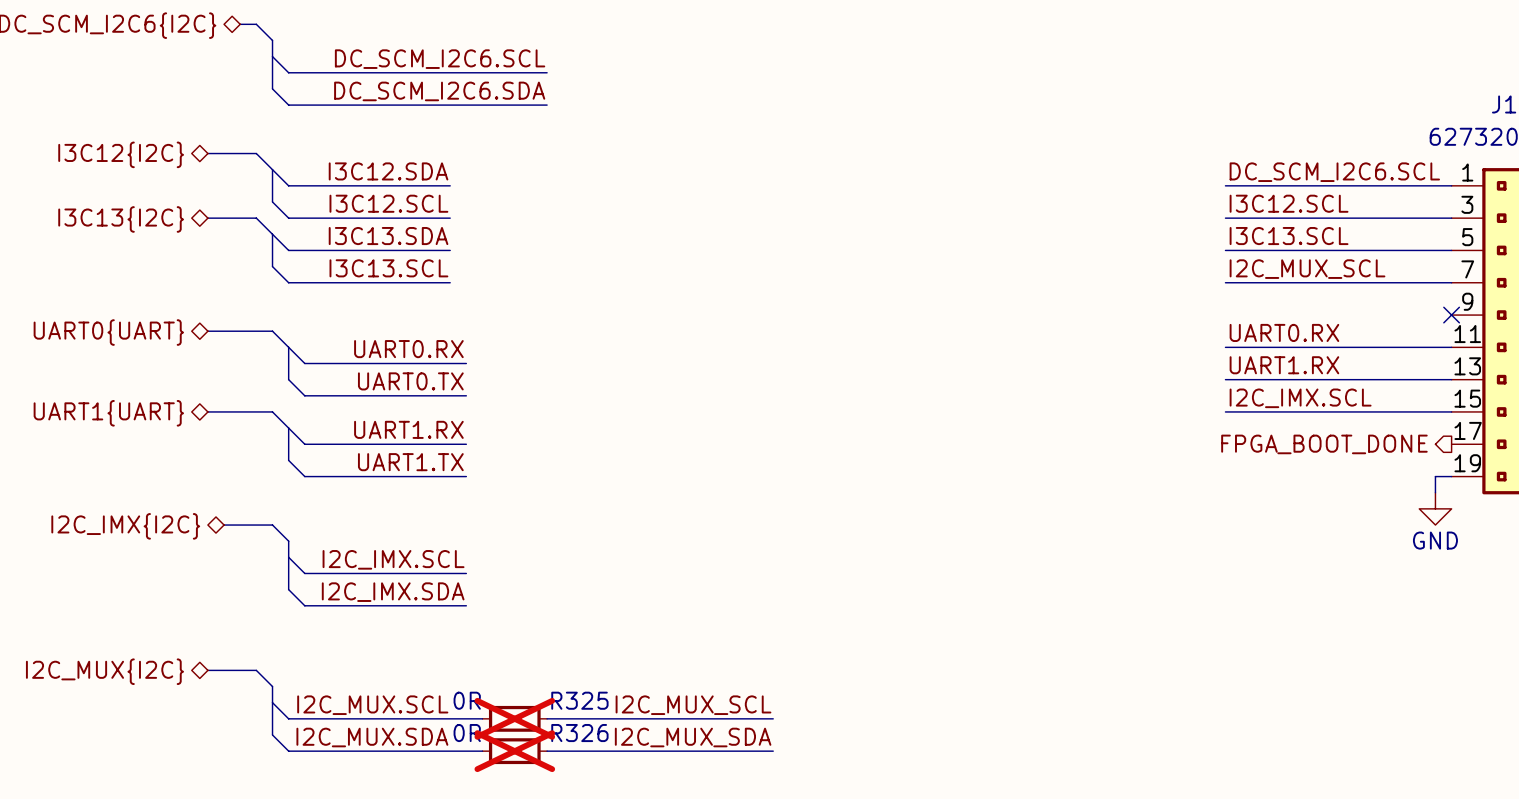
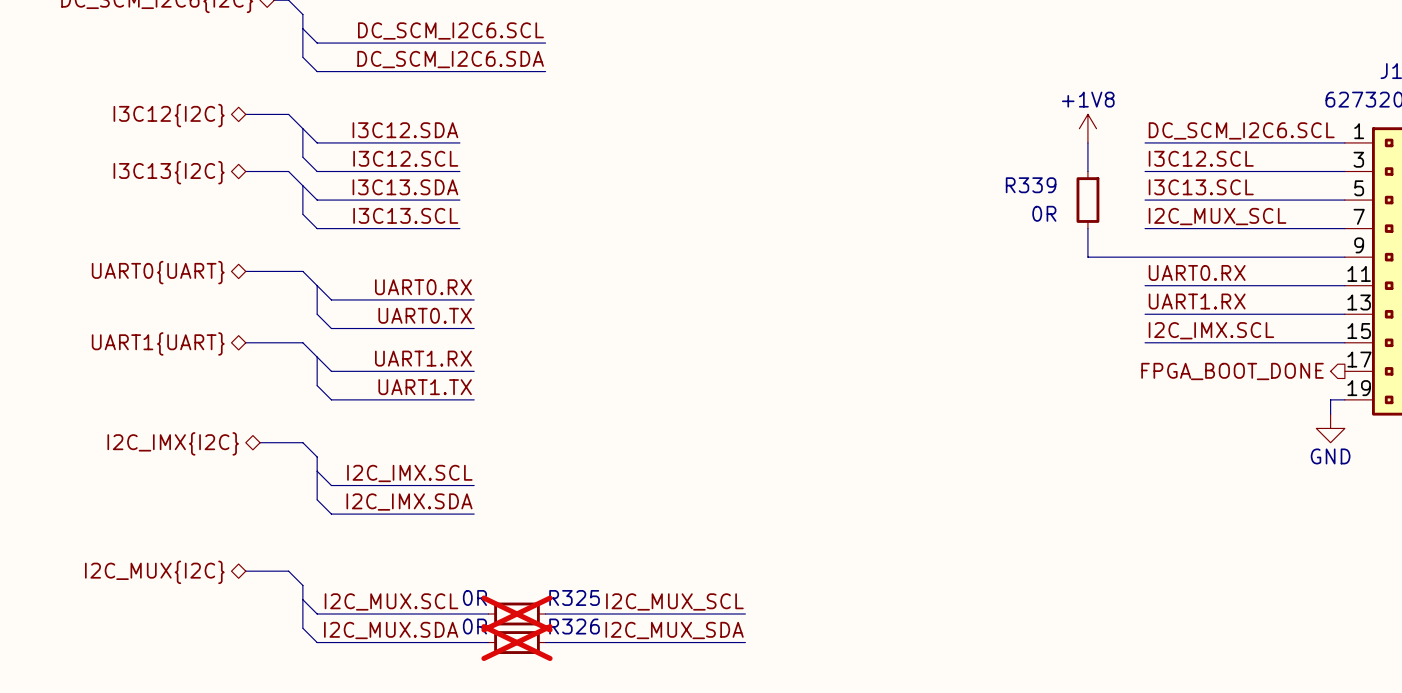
power symbol: none -> +1V8 (1087, 128)
wire: none -> (1087, 142) (1087, 171)
R339: none -> (1087, 200)
wire: none -> (1087, 228) (1087, 257) (1344, 257)
no-connect mark: (1451, 315) -> none

